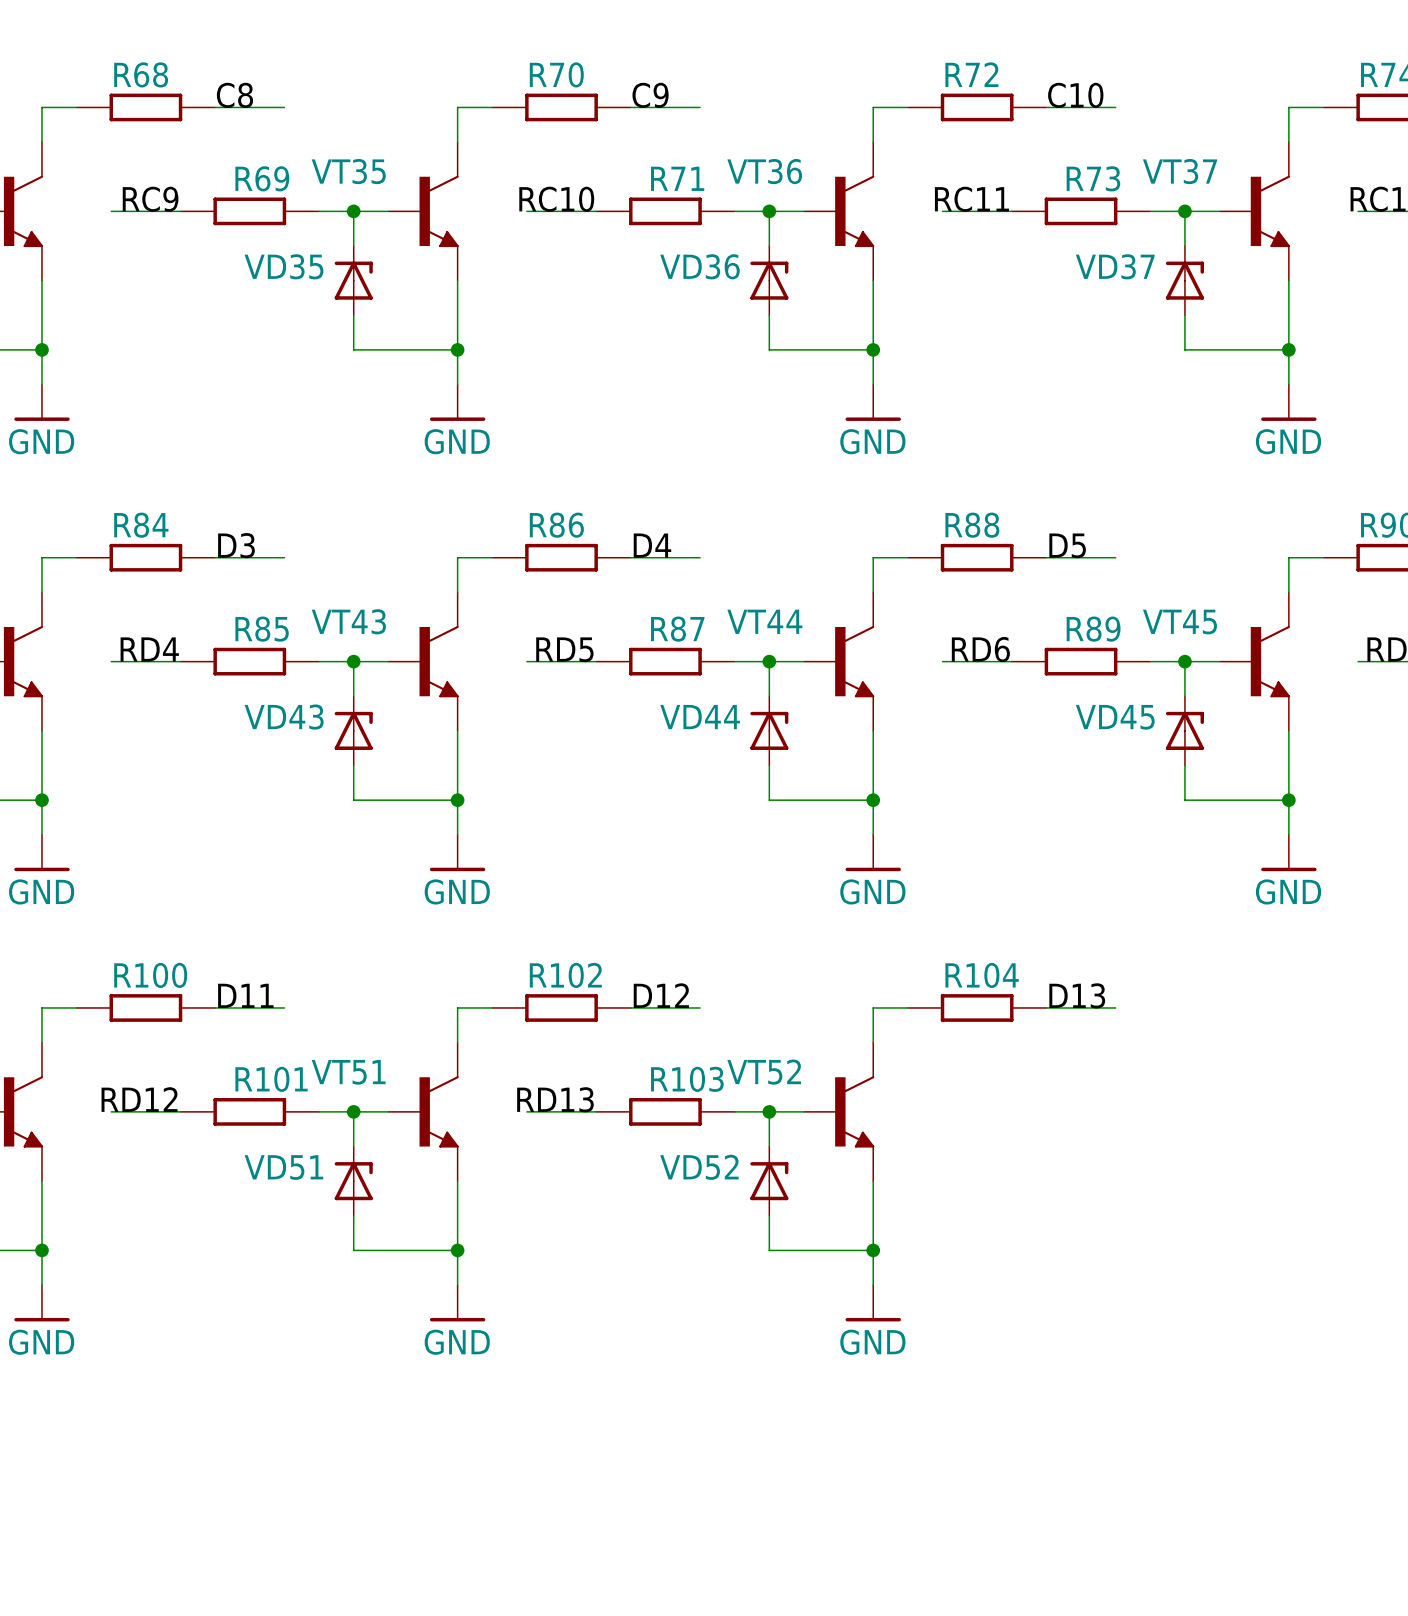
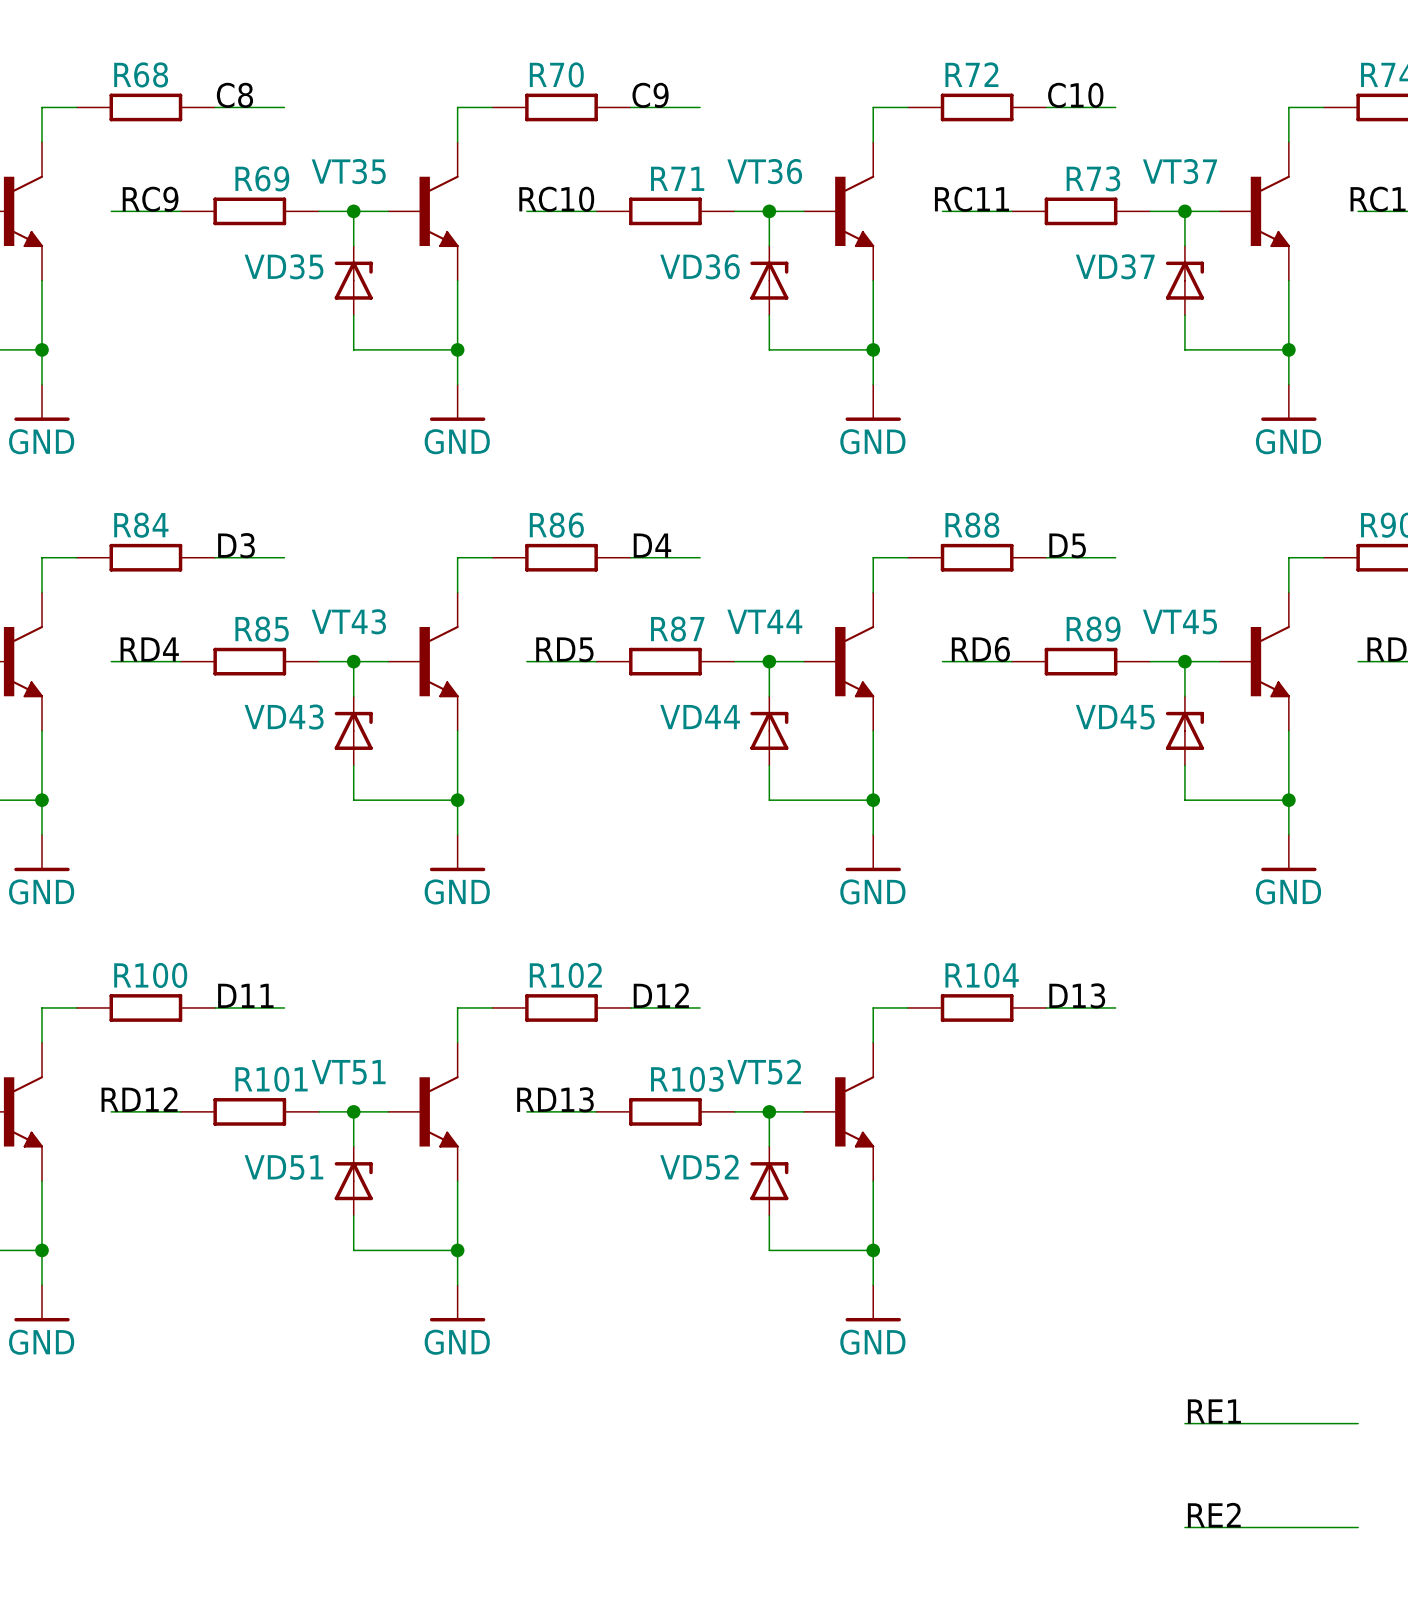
label: none -> RE1 (1214, 1411)
wire: none -> (1184, 1423) (1358, 1423)
label: none -> RE2 (1214, 1515)
wire: none -> (1184, 1527) (1358, 1527)

